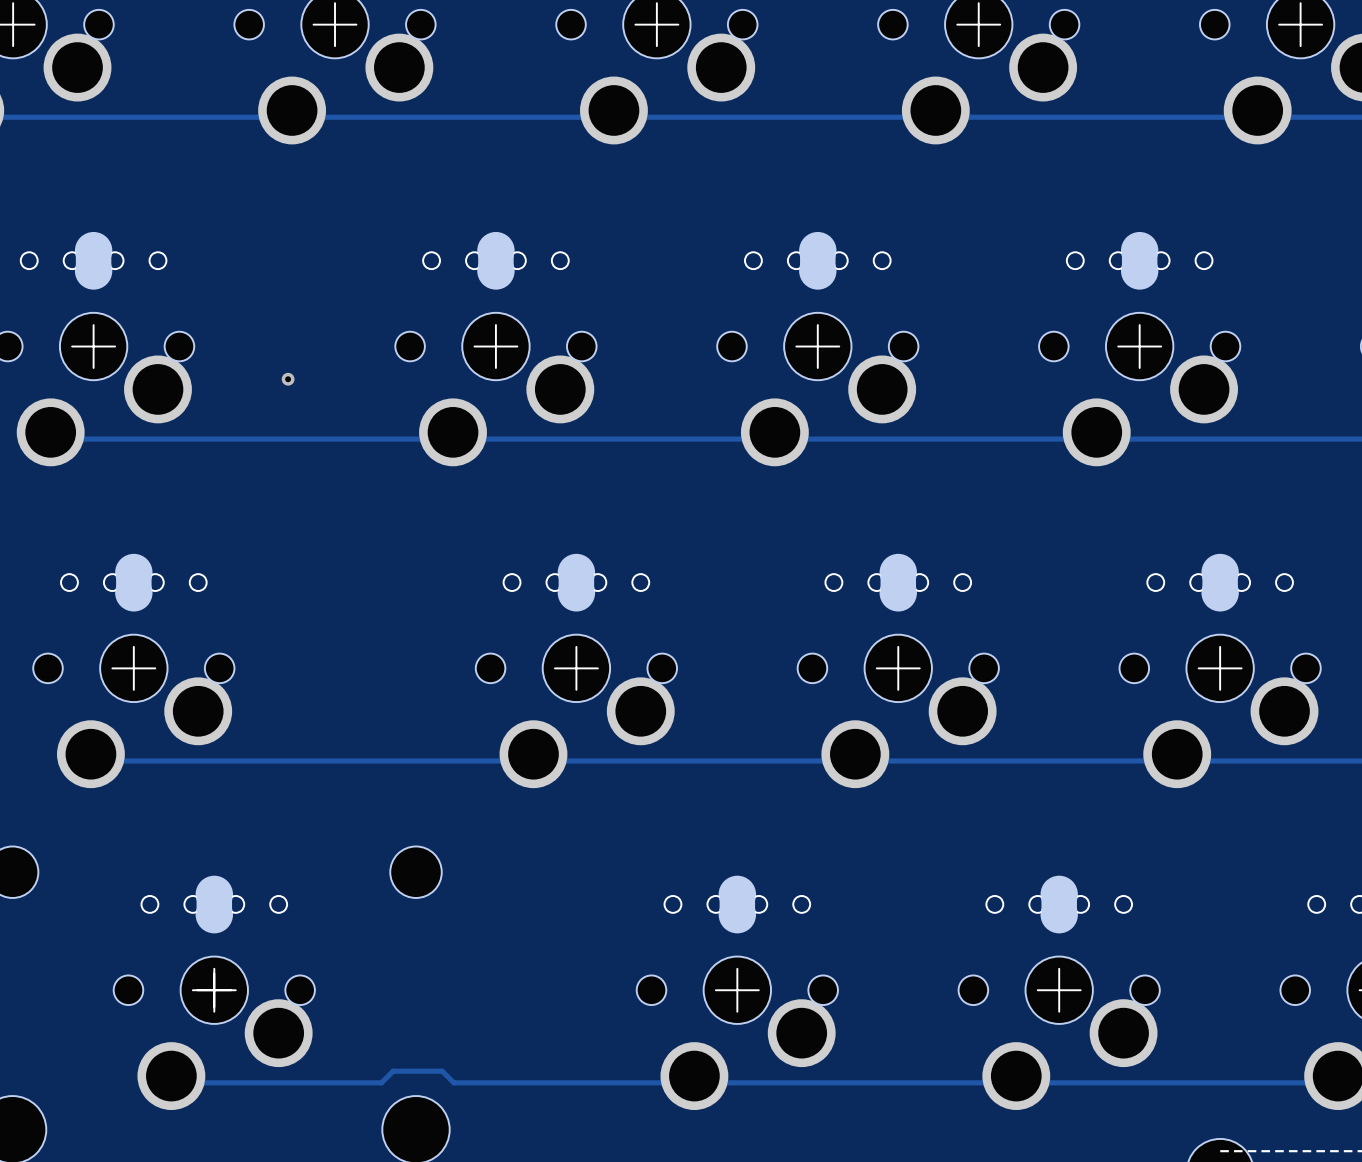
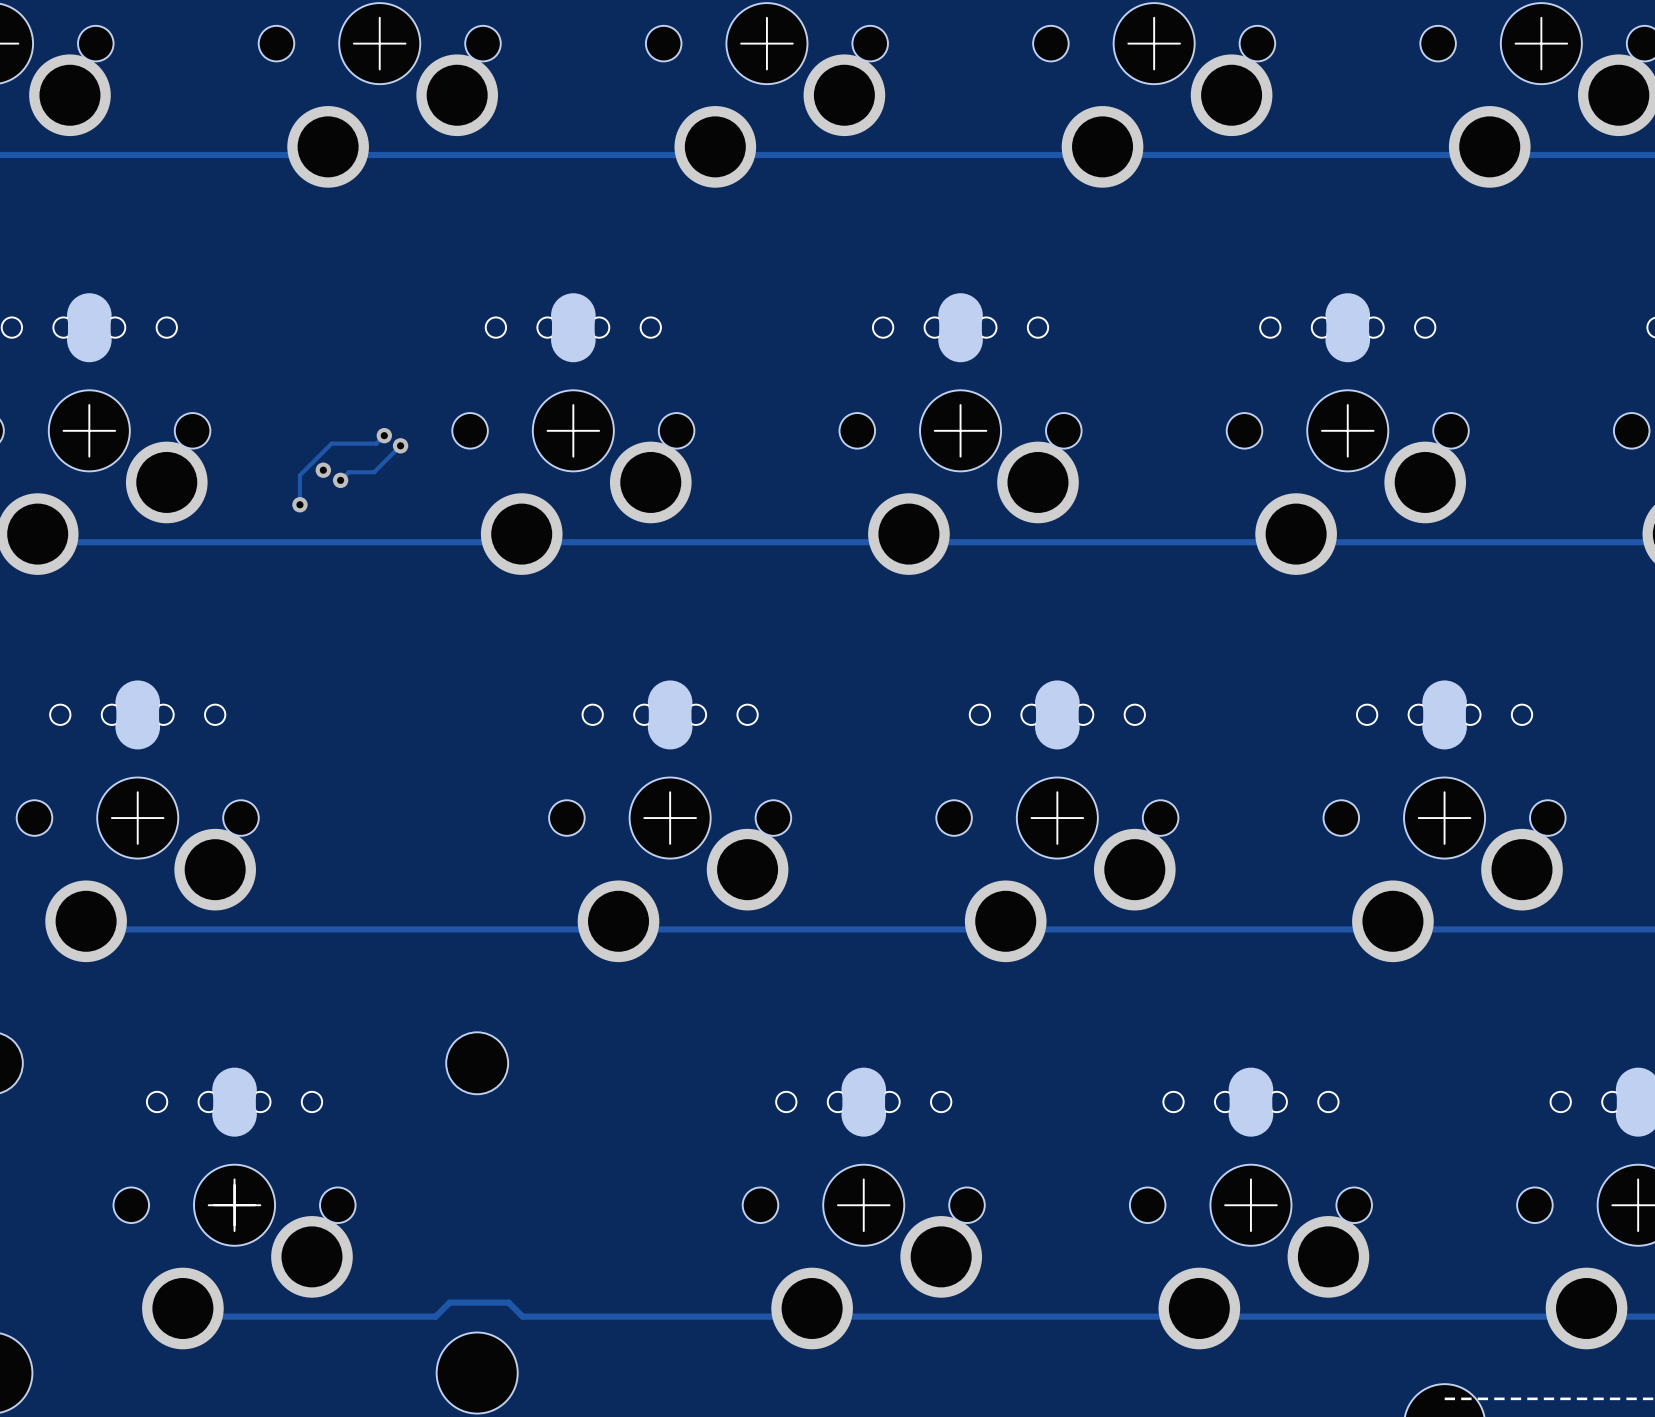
track: none -> (384, 435) (376, 443) (331, 443) (299, 475) (299, 504)
via: none -> (384, 435)
track: none -> (400, 445) (374, 472) (348, 472) (340, 480)
via: none -> (400, 445)
via: none -> (340, 480)
via: none -> (299, 504)

